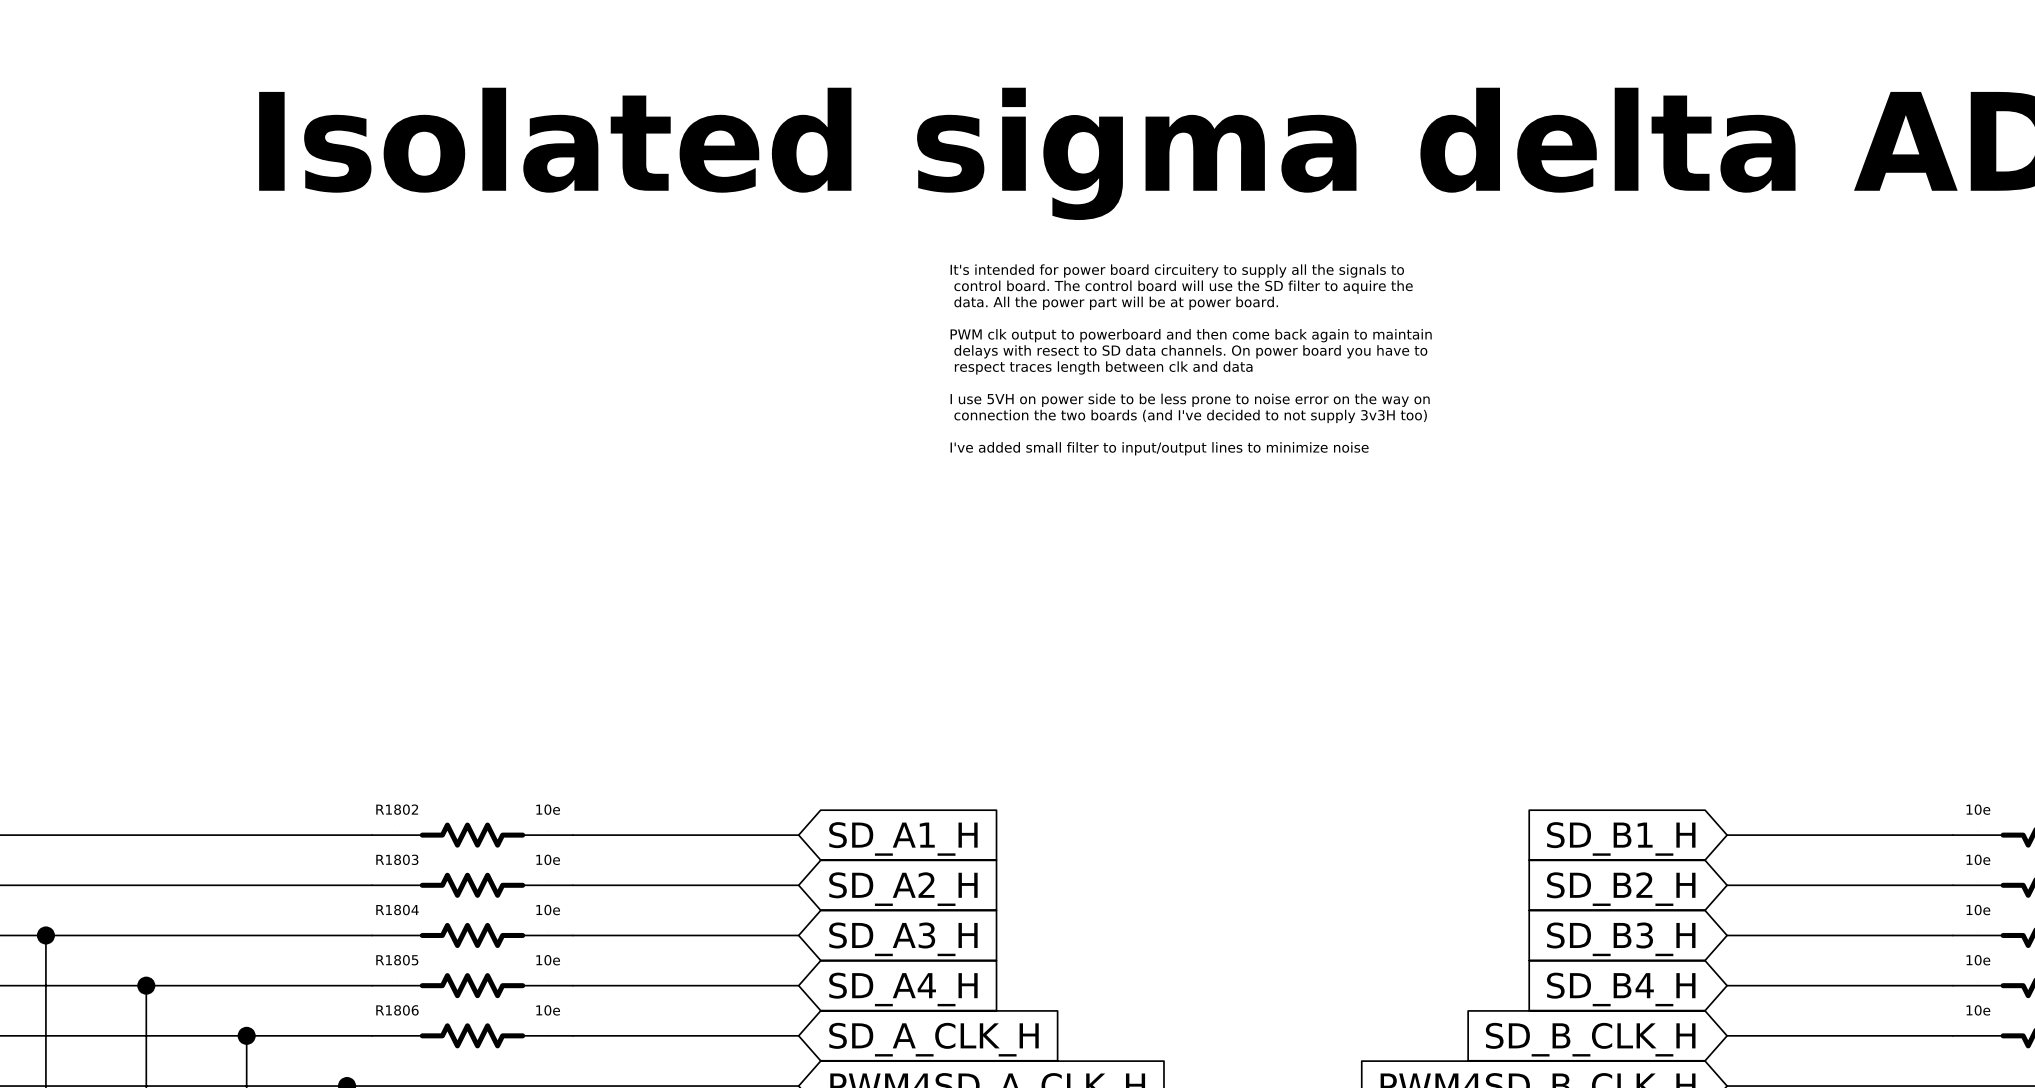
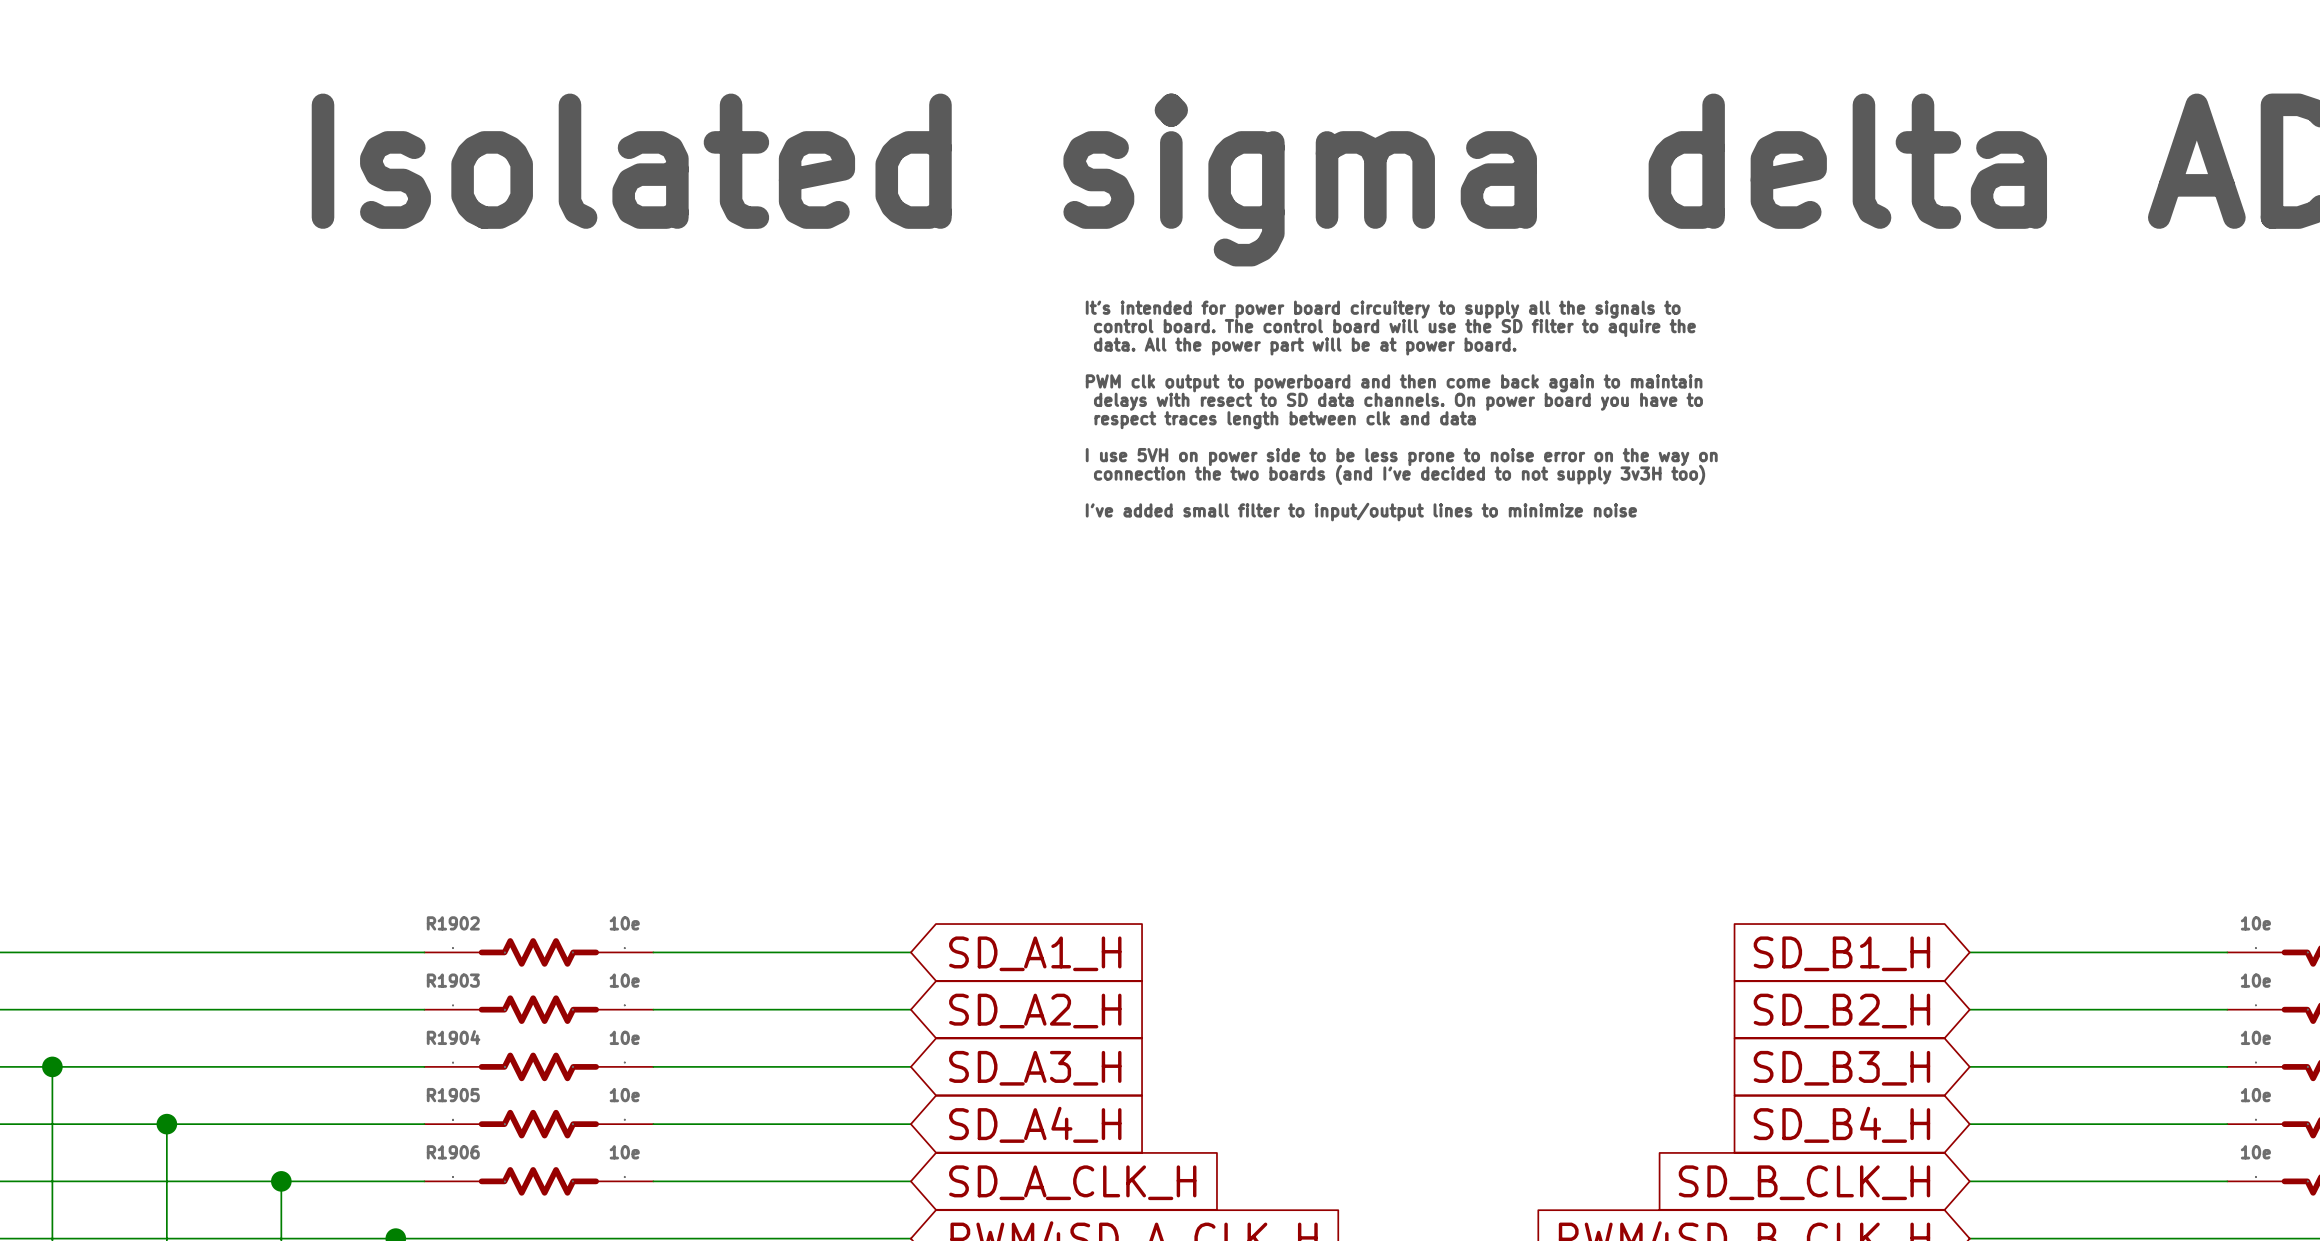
R1802 name: R1802 (397, 809) -> R1902 (453, 923)
R1803 name: R1803 (397, 859) -> R1903 (453, 980)
R1804 name: R1804 (397, 910) -> R1904 (453, 1037)
R1805 name: R1805 (397, 960) -> R1905 (453, 1095)
R1806 name: R1806 (397, 1010) -> R1906 (453, 1152)

